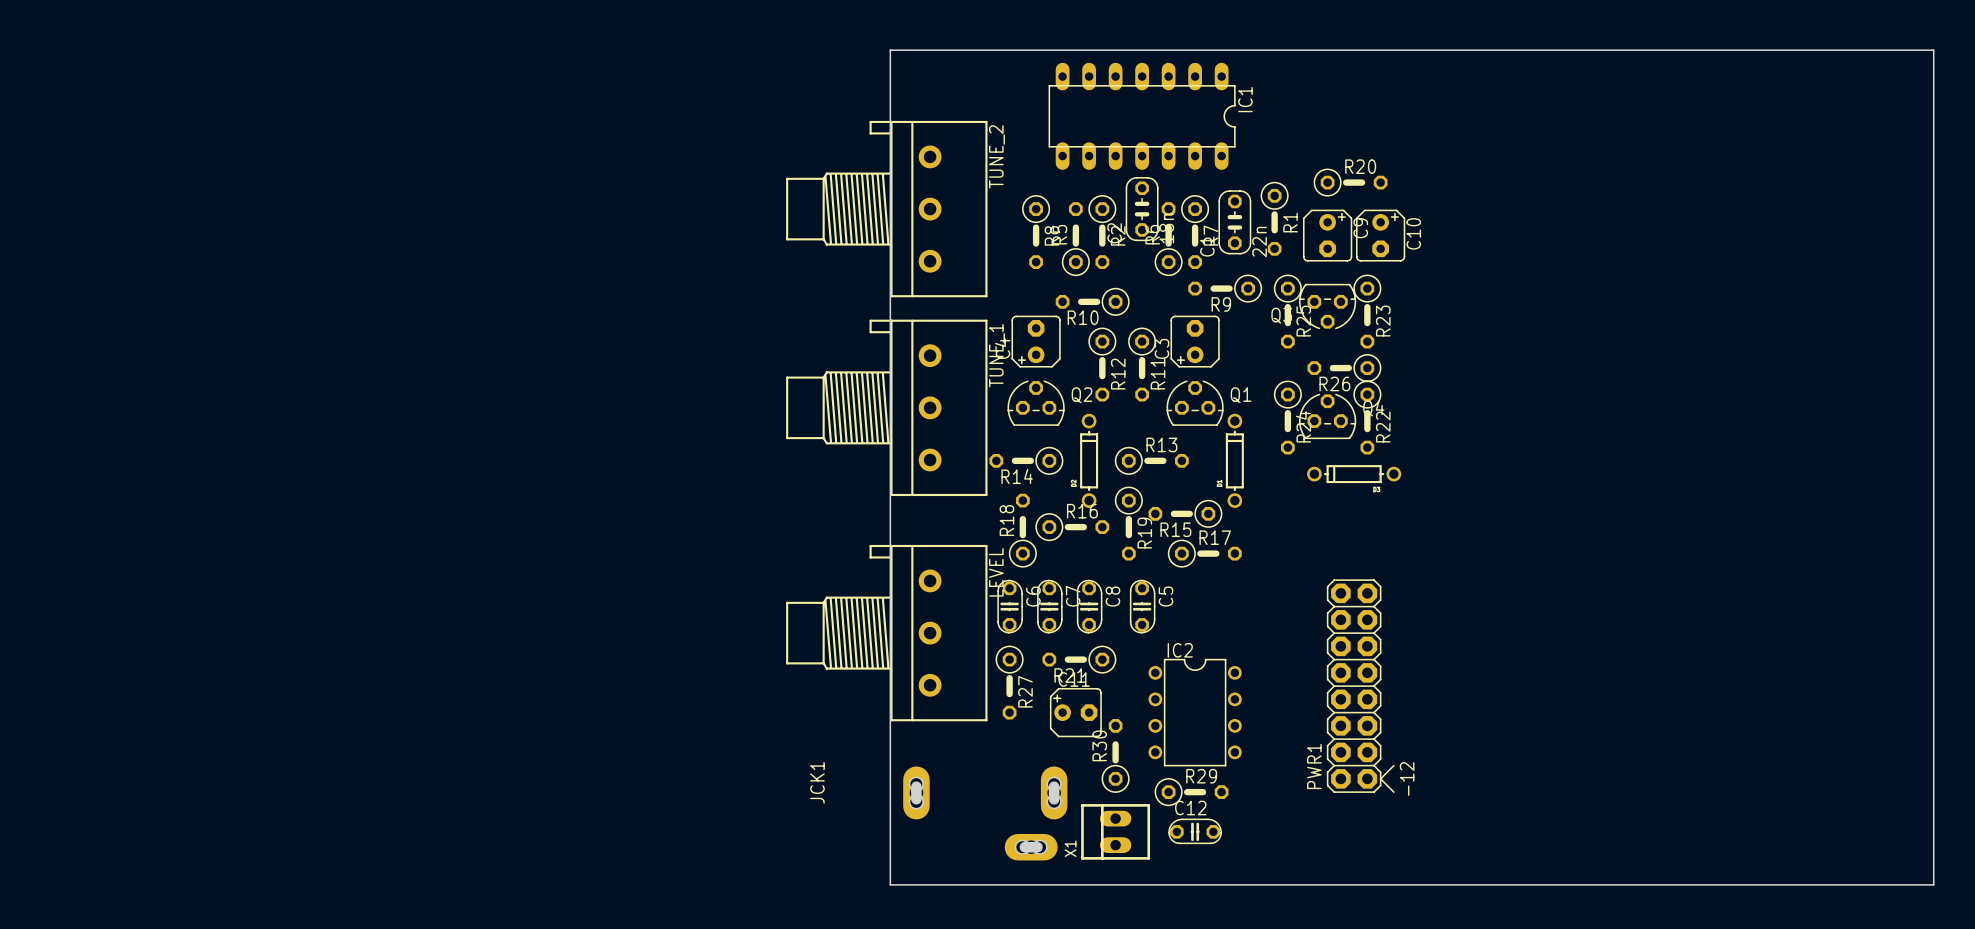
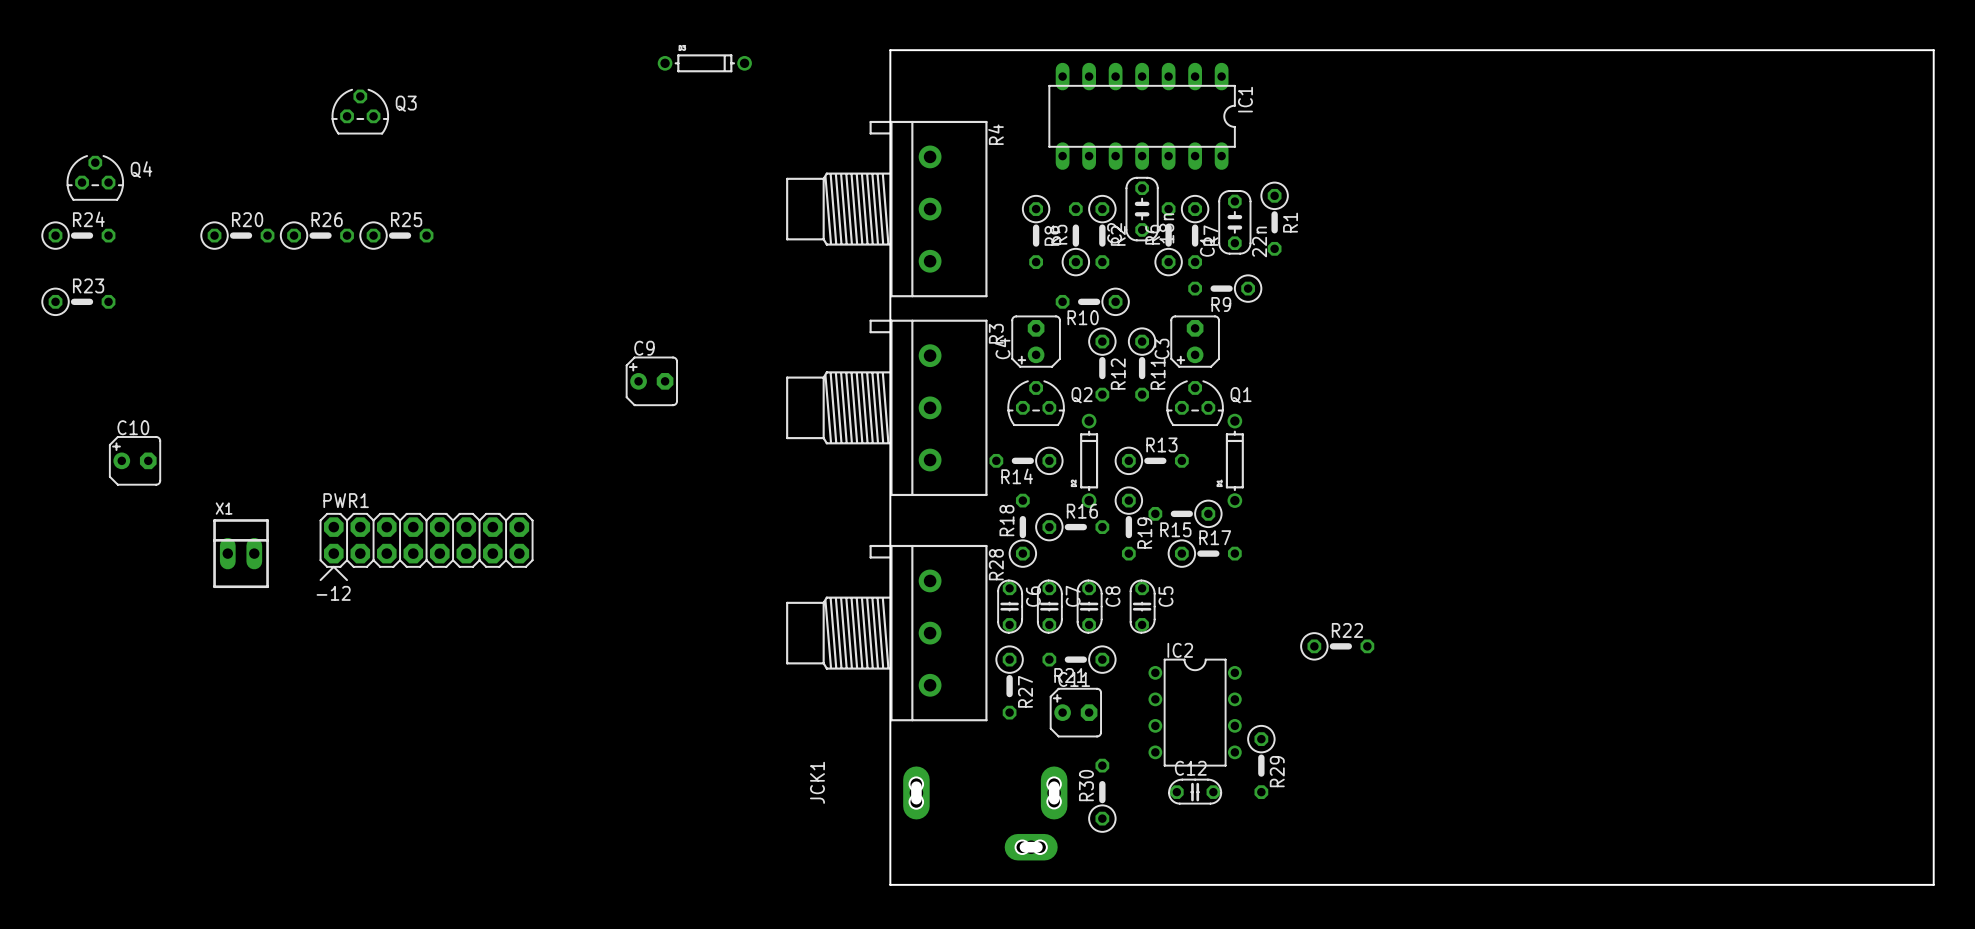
TUNE_2 name: TUNE_2 (996, 156) -> R4 (996, 134)
R20 position: (1350, 182) -> (237, 235)
C9 rotation: 0° (1327, 235) -> 90° counterclockwise (651, 381)
C9 position: (1327, 235) -> (651, 381)
C10 rotation: 0° (1380, 235) -> 90° counterclockwise (135, 460)
C10 position: (1380, 235) -> (135, 460)
Q3 rotation: 0° (1327, 306) -> 180° (360, 111)
Q3 position: (1327, 306) -> (360, 111)
R25 rotation: 0° (1287, 311) -> 90° counterclockwise (396, 235)
R25 position: (1287, 311) -> (396, 235)
R23 rotation: 0° (1367, 311) -> 90° counterclockwise (78, 301)
R23 position: (1367, 311) -> (78, 301)
TUNE_1 name: TUNE_1 (996, 355) -> R3 (996, 333)
R26 rotation: 0° (1344, 368) -> 180° (317, 235)
R26 position: (1344, 368) -> (317, 235)
Q4 position: (1327, 416) -> (95, 177)
R24 rotation: 0° (1287, 417) -> 90° counterclockwise (78, 235)
R24 position: (1287, 417) -> (78, 235)
R22 rotation: 0° (1367, 417) -> 90° counterclockwise (1337, 646)
R22 position: (1367, 417) -> (1337, 646)
part rotation: 0° (1354, 474) -> 180° (704, 63)
part position: (1354, 474) -> (704, 63)
LEVEL name: LEVEL (996, 572) -> R28 (996, 564)
PWR1 rotation: 0° (1360, 686) -> 90° clockwise (426, 546)
PWR1 position: (1360, 686) -> (426, 546)
R30 position: (1115, 755) -> (1102, 795)
R29 rotation: 0° (1191, 792) -> 90° clockwise (1261, 762)
R29 position: (1191, 792) -> (1261, 762)
X1 rotation: 0° (1115, 831) -> 90° clockwise (241, 553)
X1 position: (1115, 831) -> (241, 553)
C12 position: (1195, 831) -> (1195, 791)

